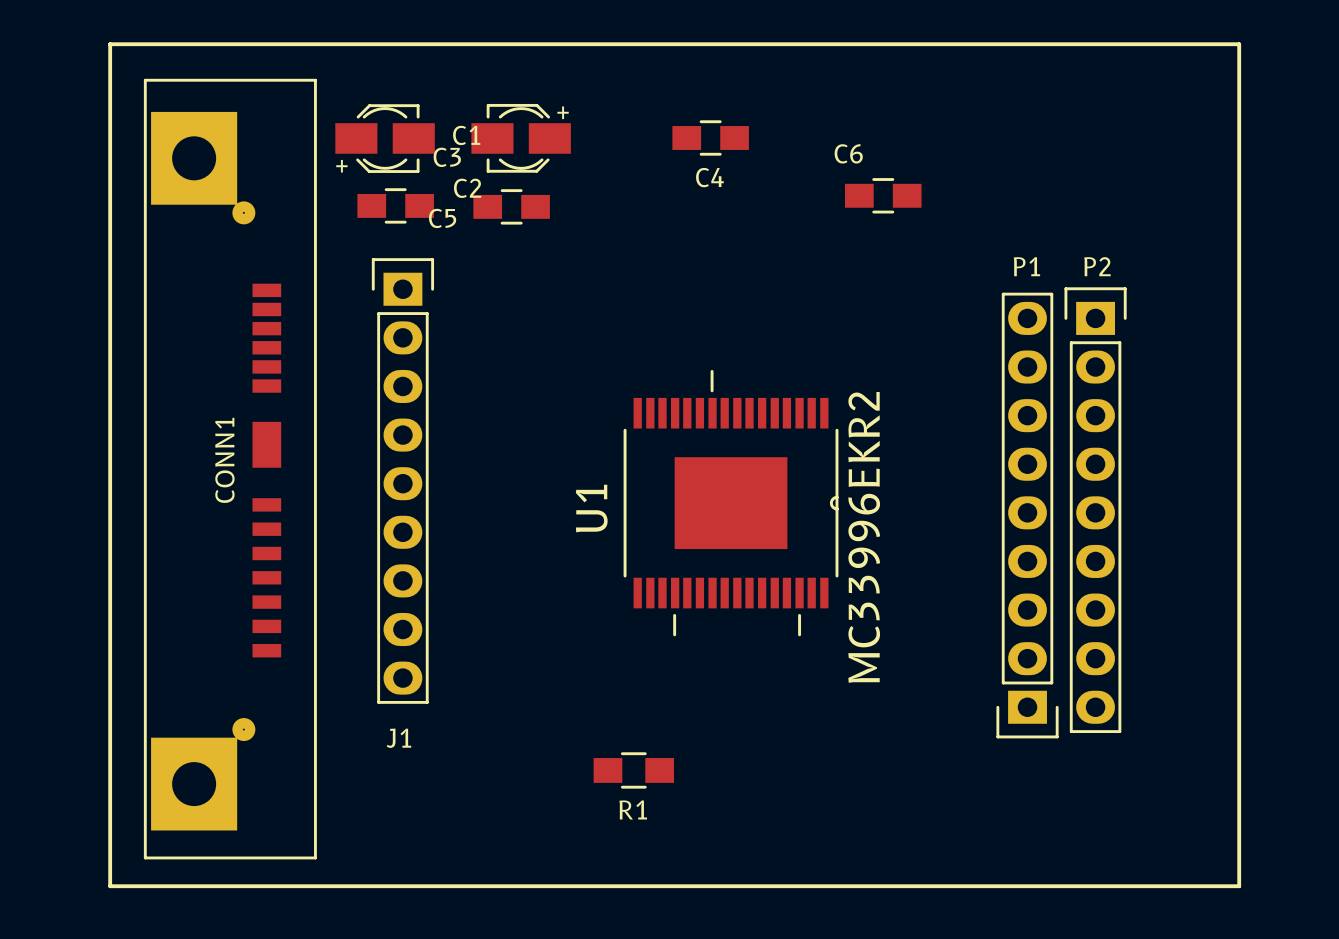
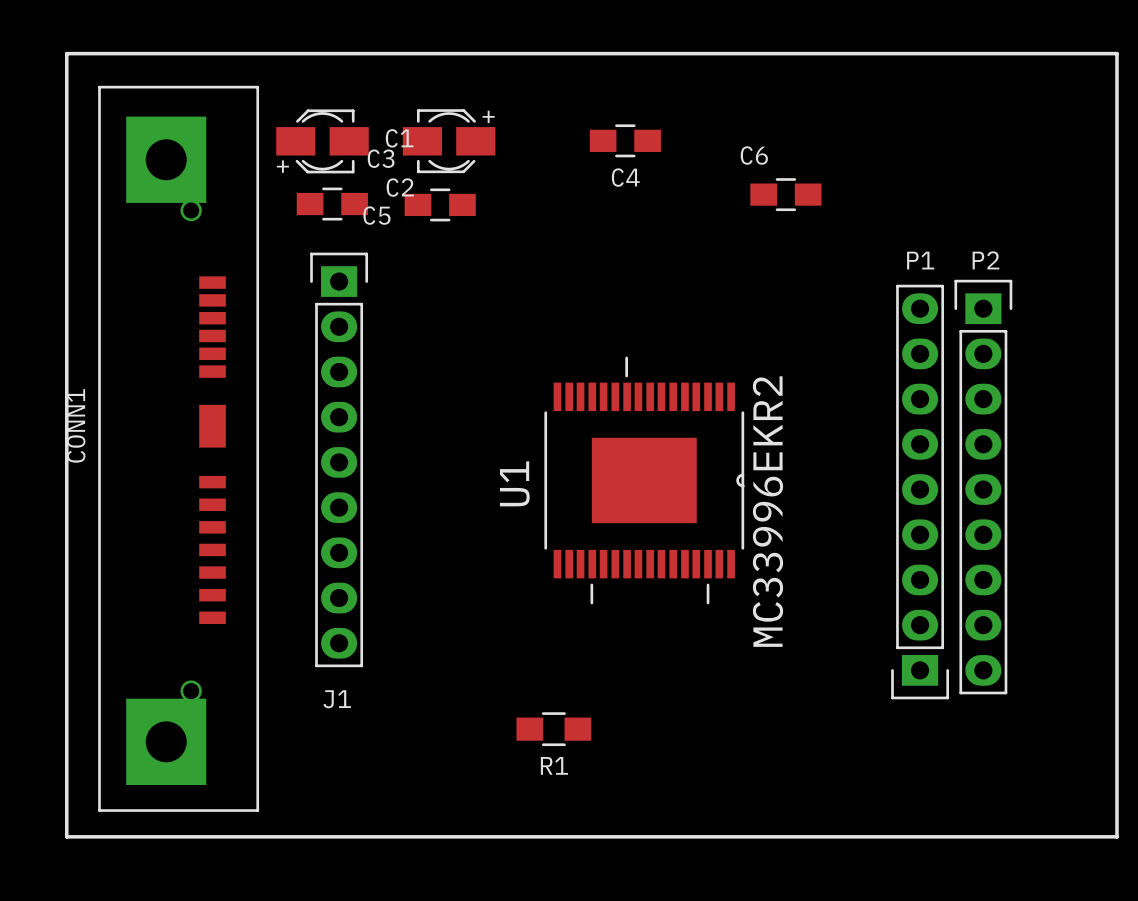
CONN1 footprint: [143, 78, 317, 860] -> [98, 85, 260, 812]
CONN1 name position: CONN1 (224, 460) -> CONN1 (76, 425)

